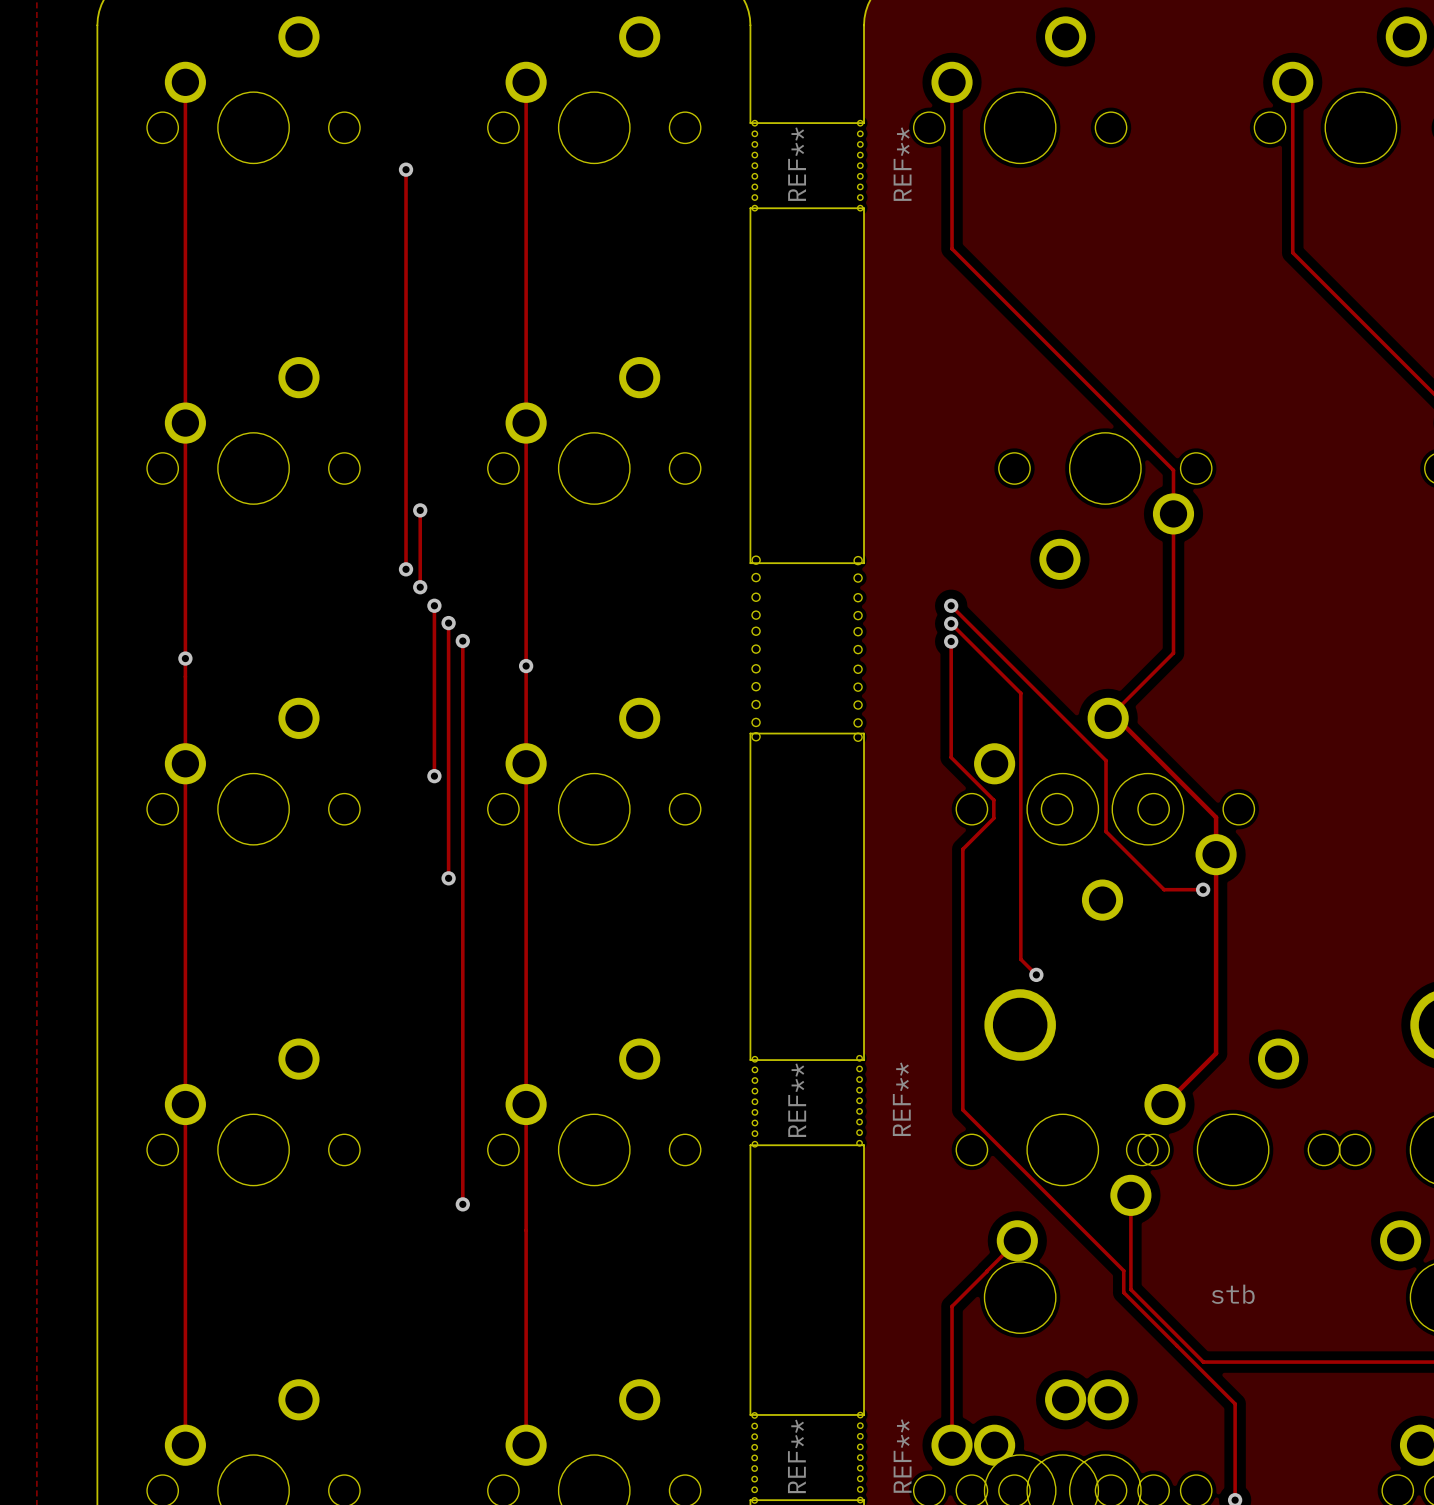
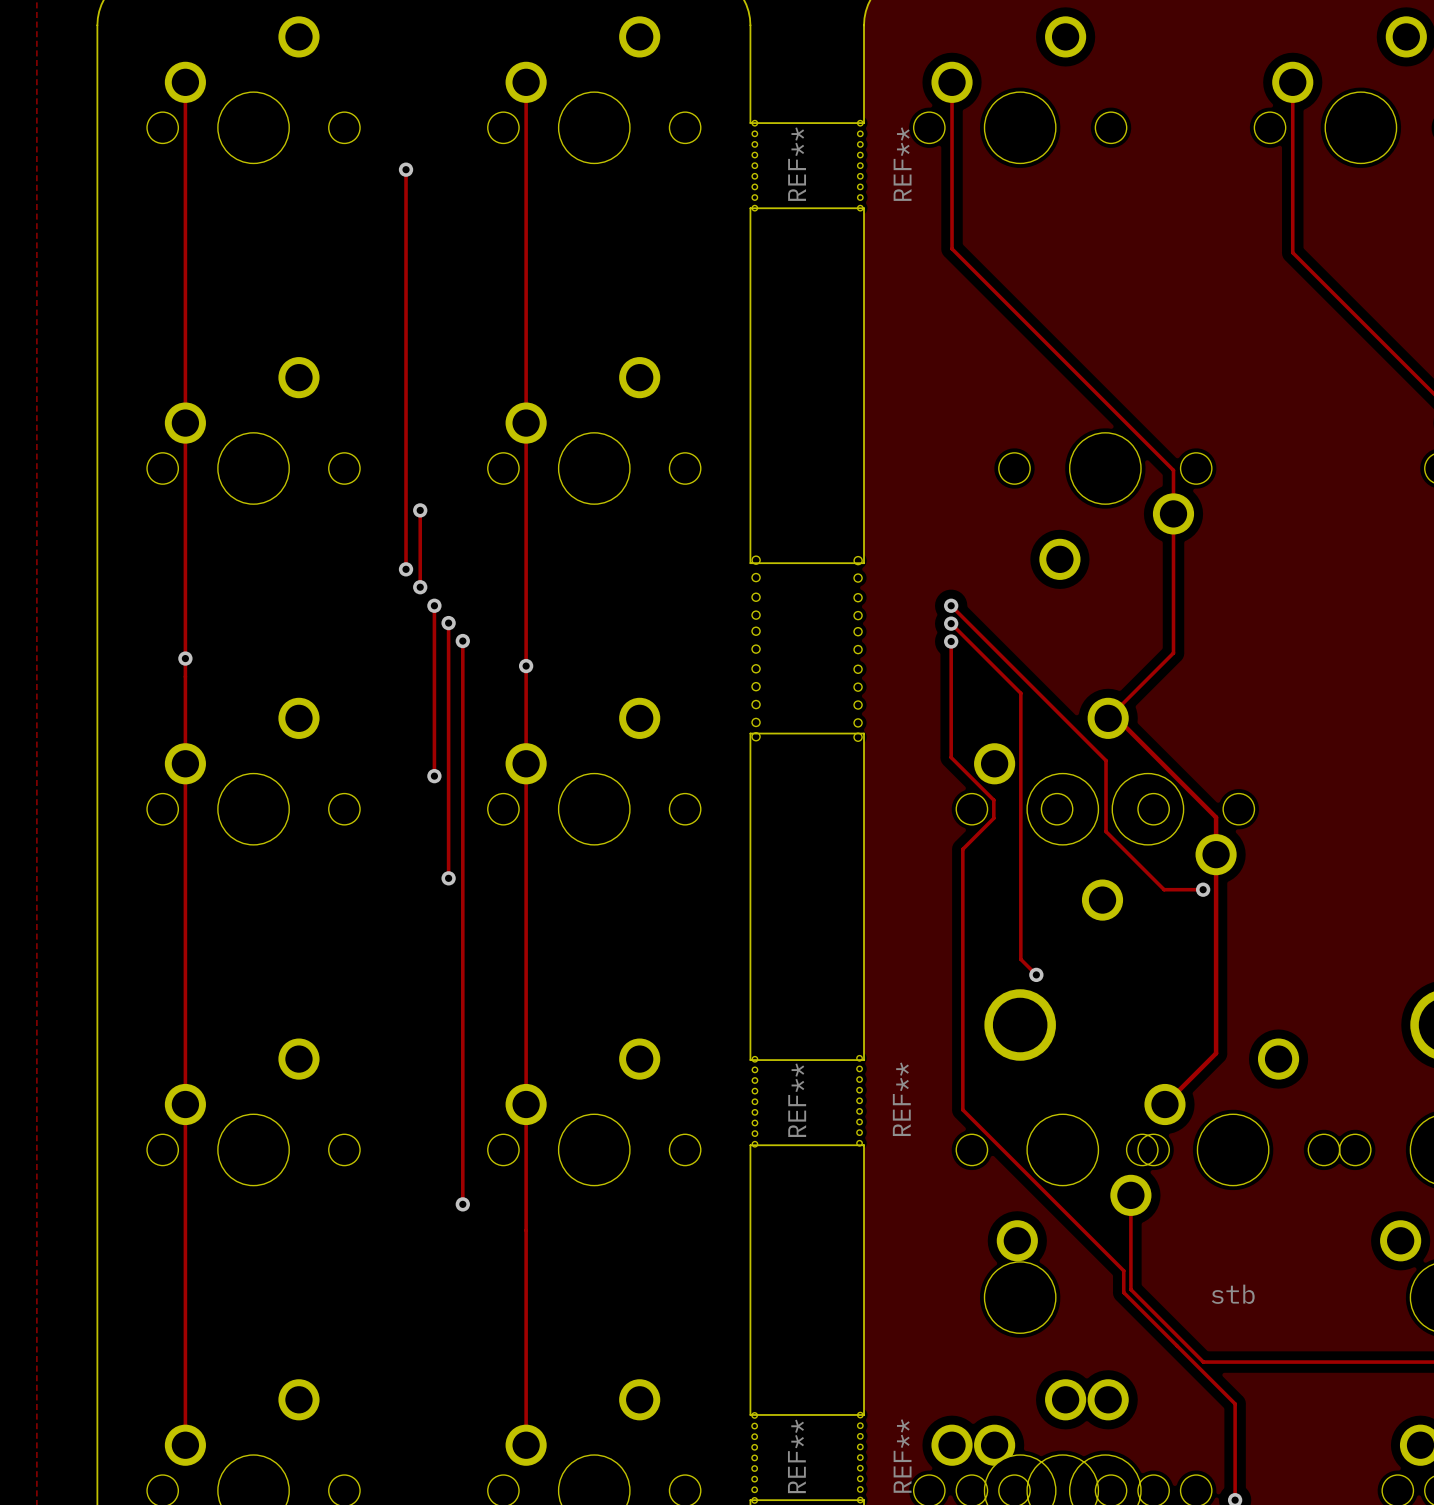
track: (1017, 1240) (986, 1271) -> none
track: (986, 1271) (952, 1306) (952, 1445) -> none

